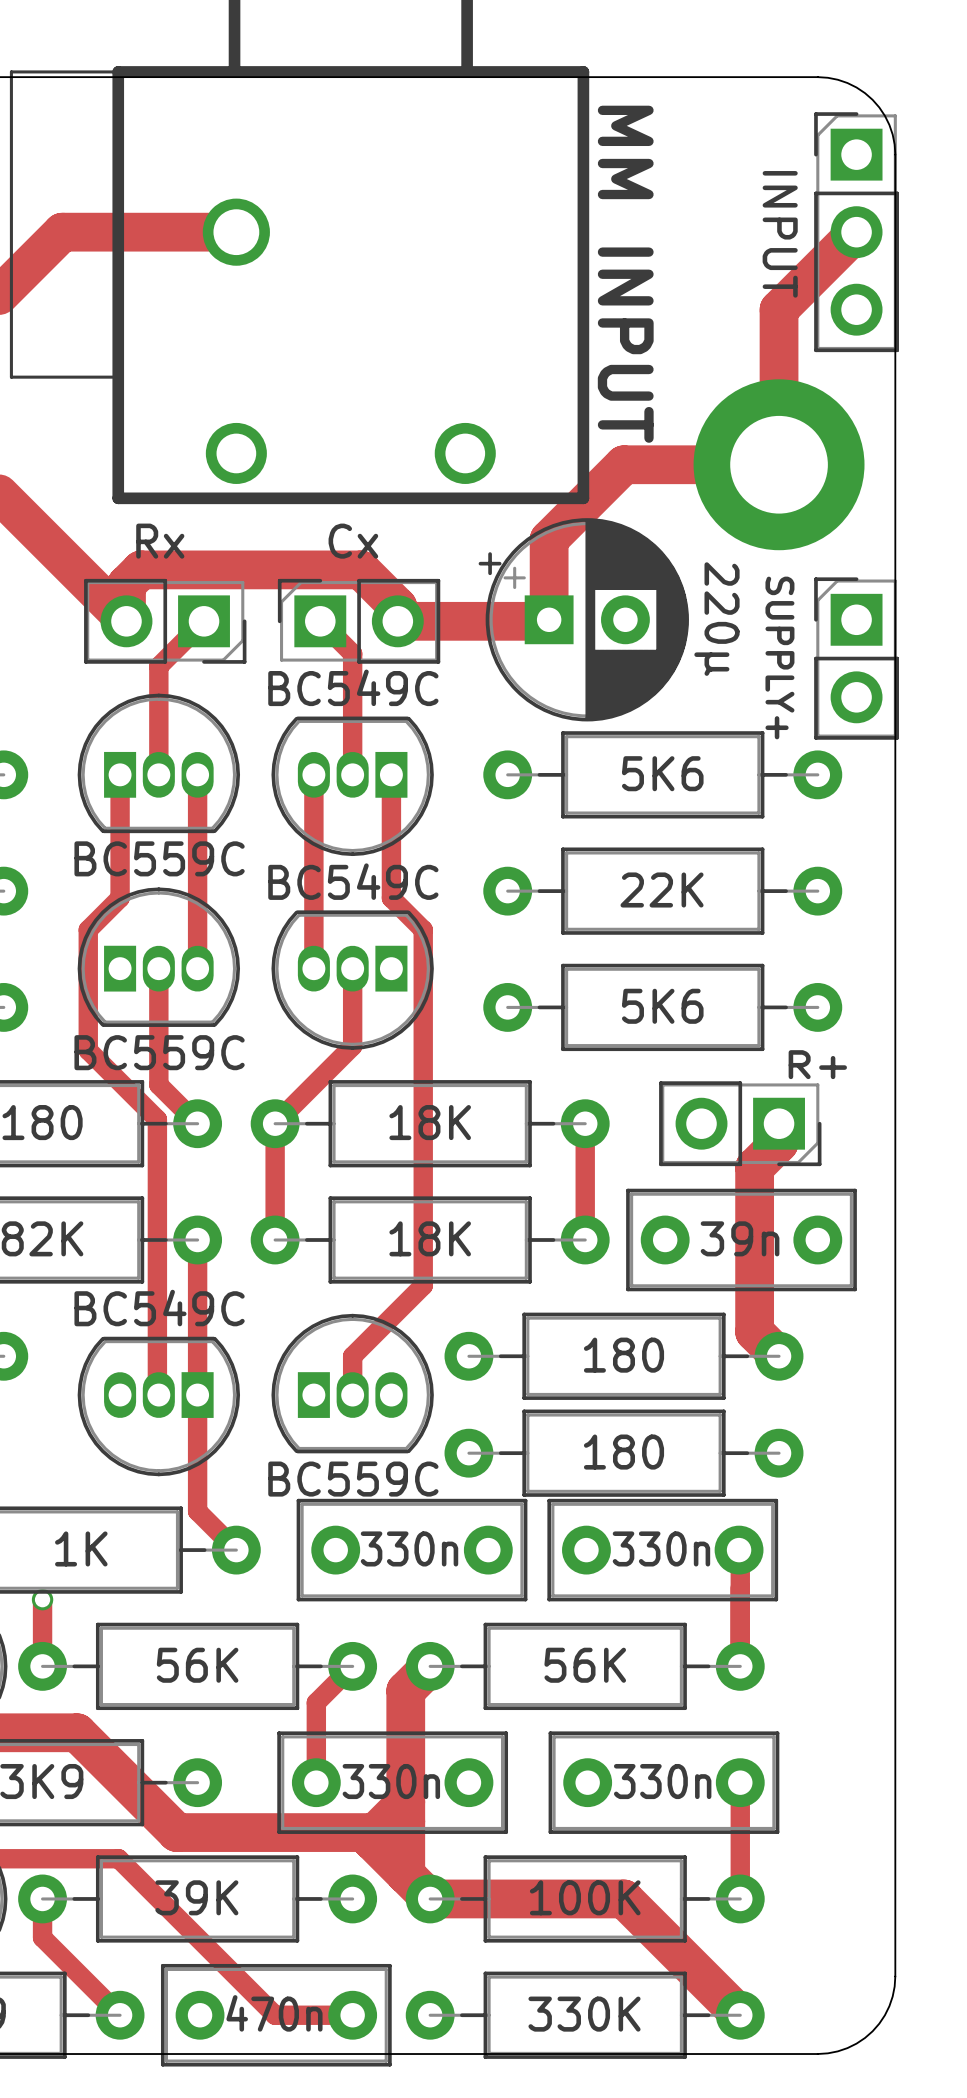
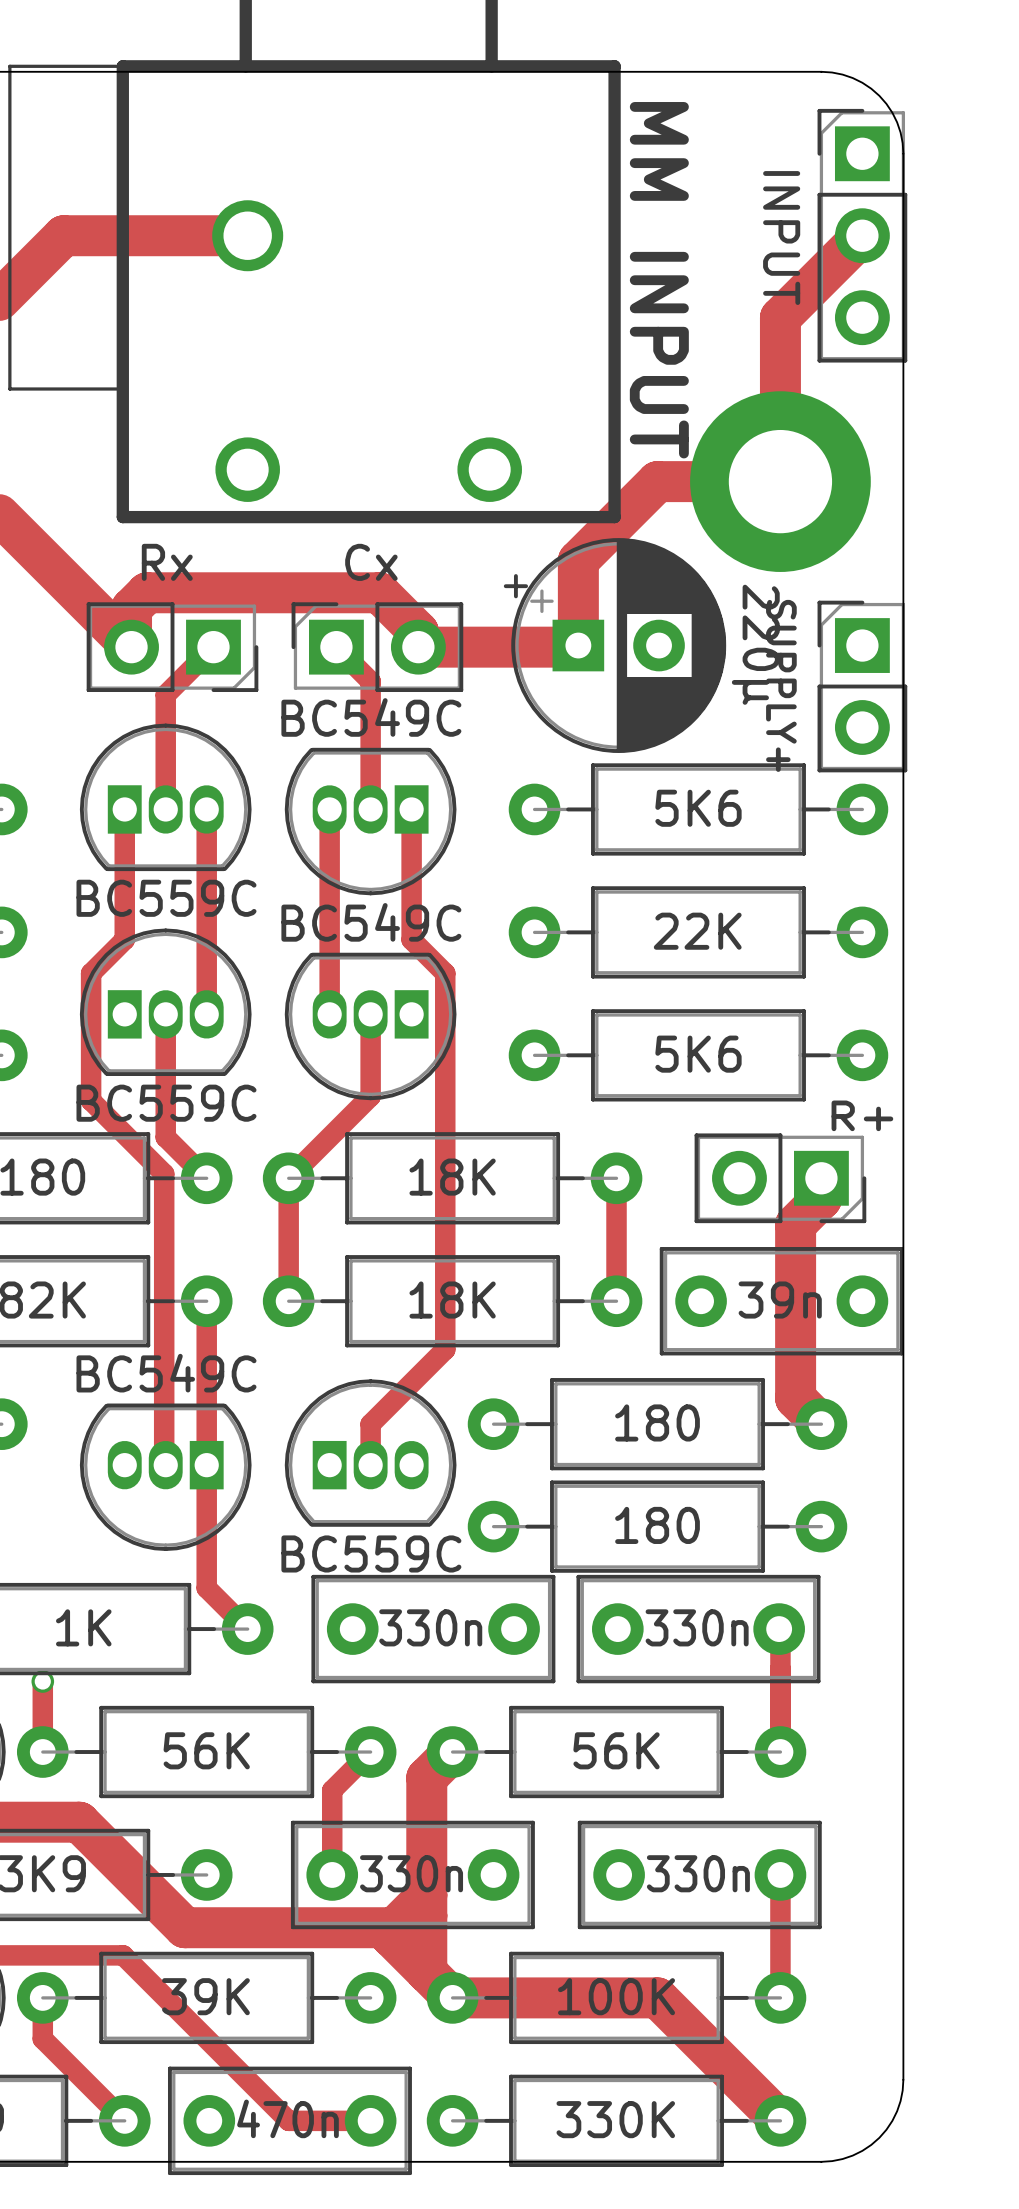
board edge: (779, 77) (827, 77) (856, 87) (872, 99) (884, 115) (892, 134) (895, 154) (895, 1976) (892, 1996) (884, 2015) (872, 2031) (856, 2043) (827, 2053) (779, 2054) -> (821, 71) (852, 78) (879, 95) (897, 122) (903, 153) (903, 2079) (897, 2111) (879, 2137) (852, 2155) (821, 2161)
track: (856, 232) (779, 309) (779, 464) (740, 464) -> (862, 235) (780, 317) (780, 481)
part position: (856, 232) -> (862, 235)
part position: (779, 464) -> (780, 481)
part position: (856, 658) -> (862, 686)

